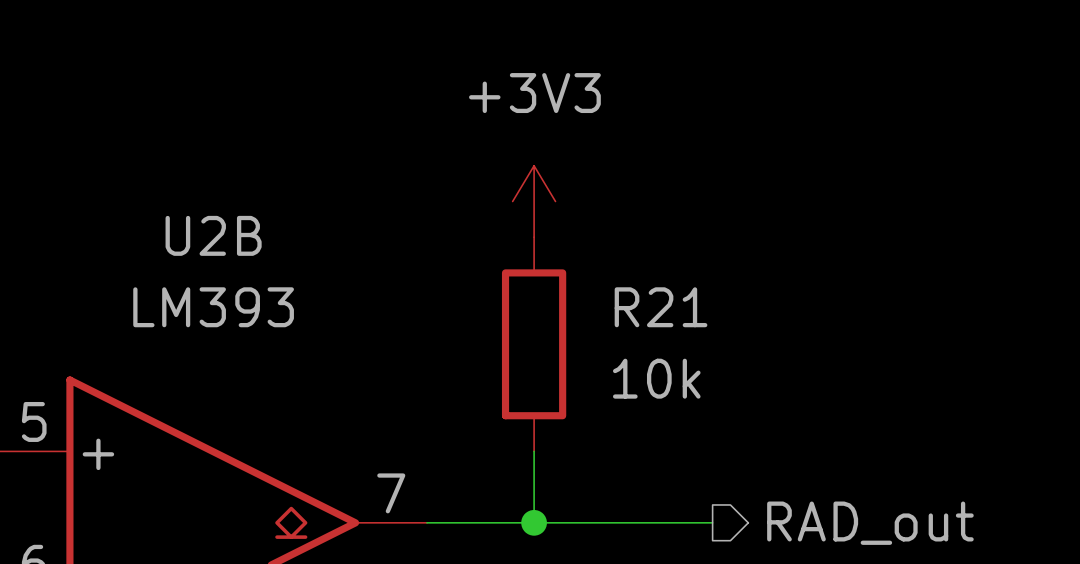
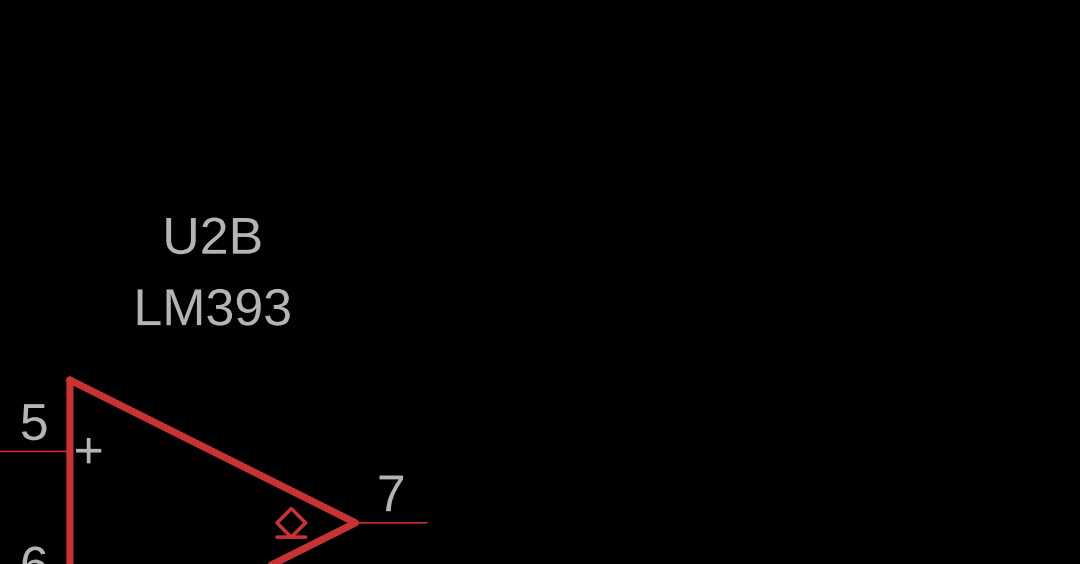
power symbol: +3V3 (534, 201) -> none
R21: 10k (534, 344) -> none
wire: (534, 451) (534, 522) -> none
wire: (426, 522) (712, 522) -> none
junction: (534, 522) -> none
hierarchical label: RAD_out (870, 523) -> none

